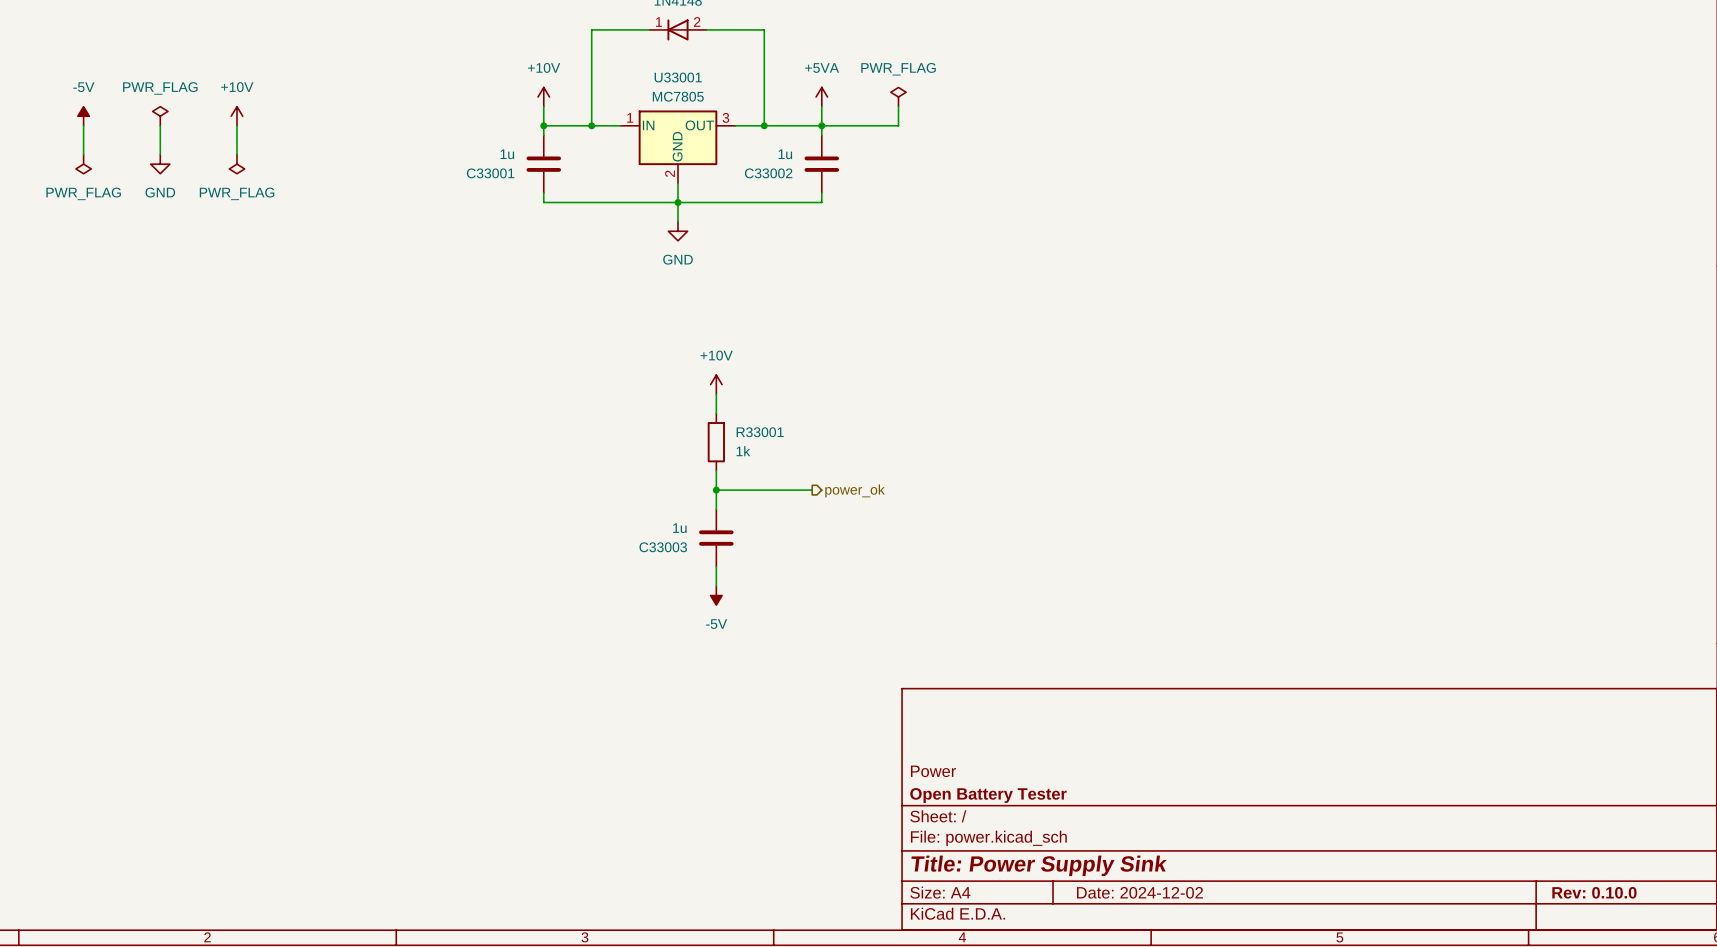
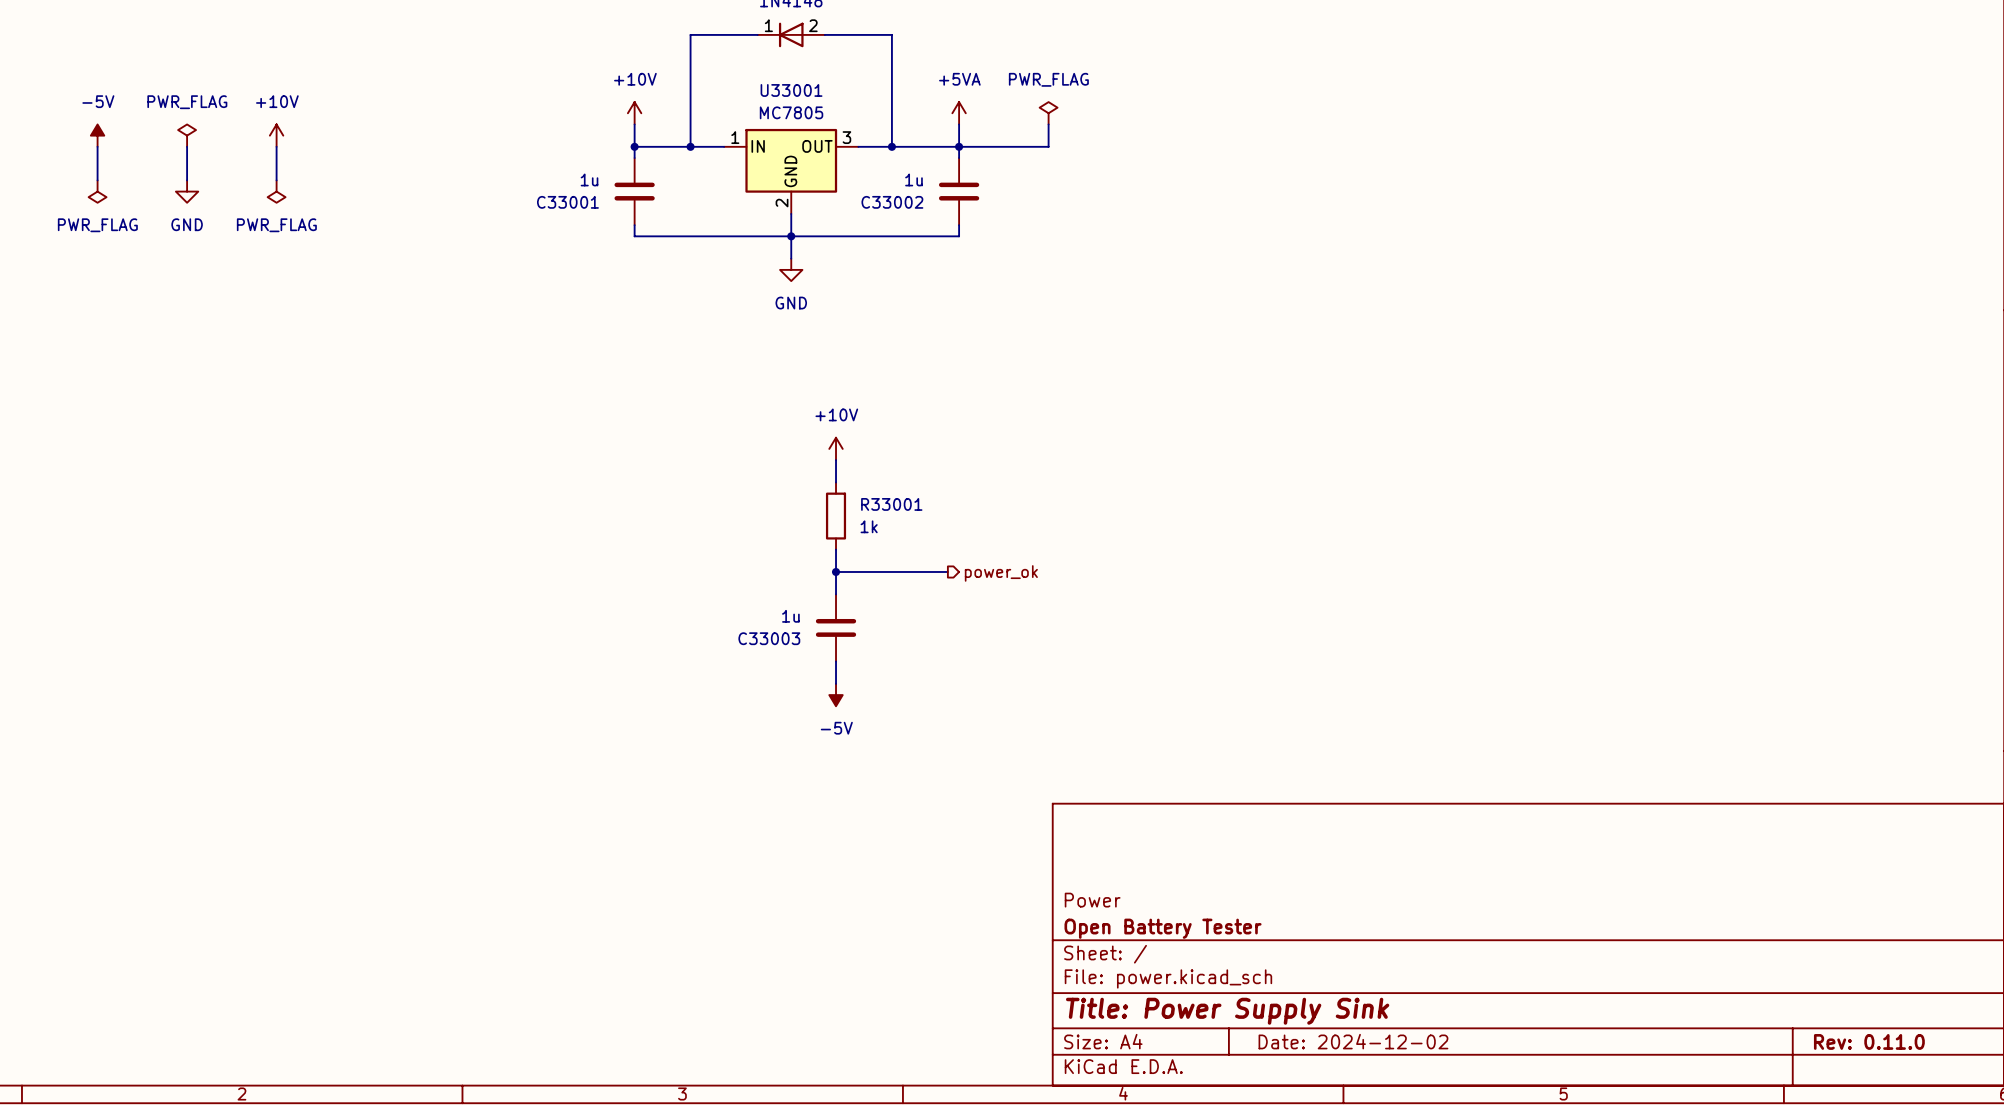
title block: Rev: 0.10.0 (1594, 892) -> Rev: 0.11.0 (1869, 1041)

